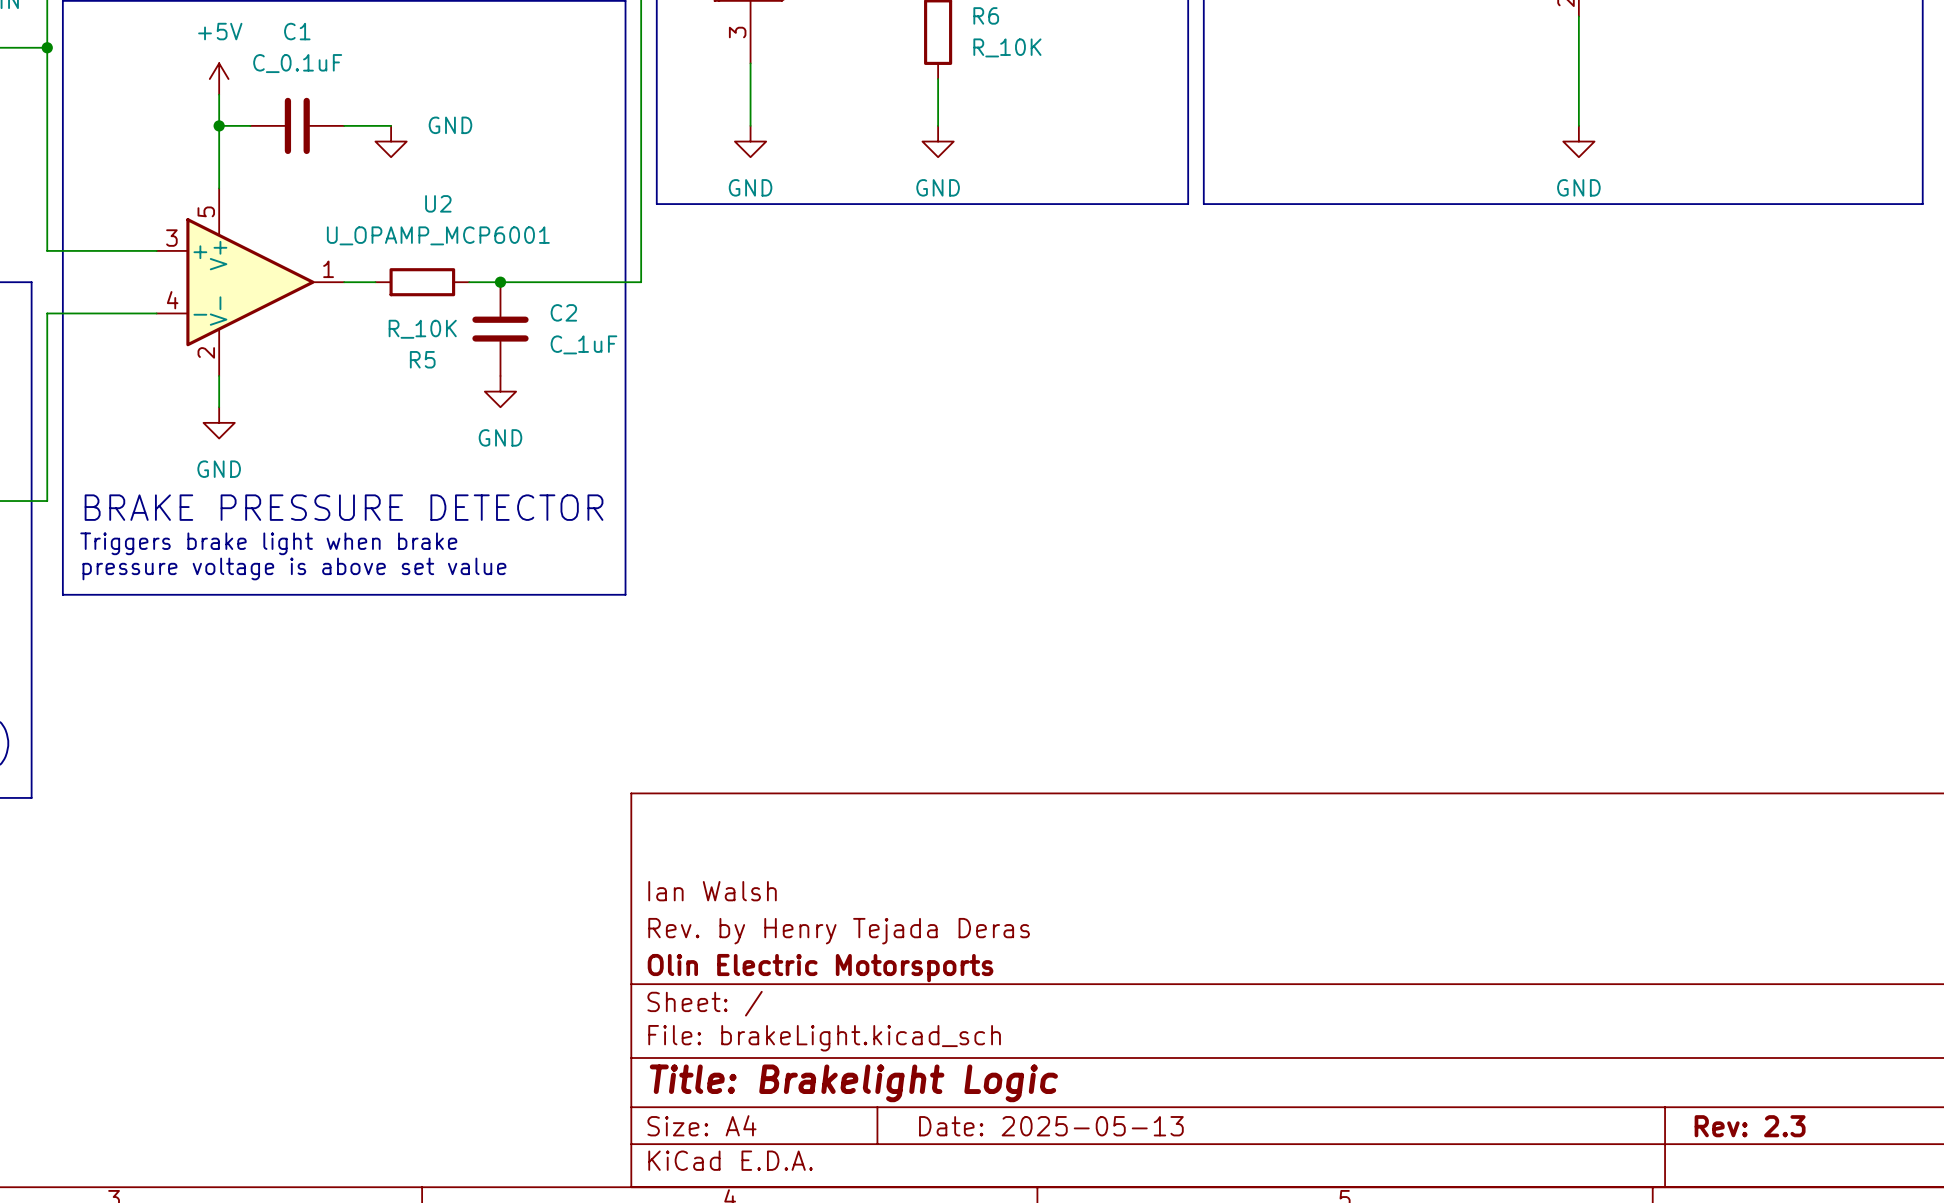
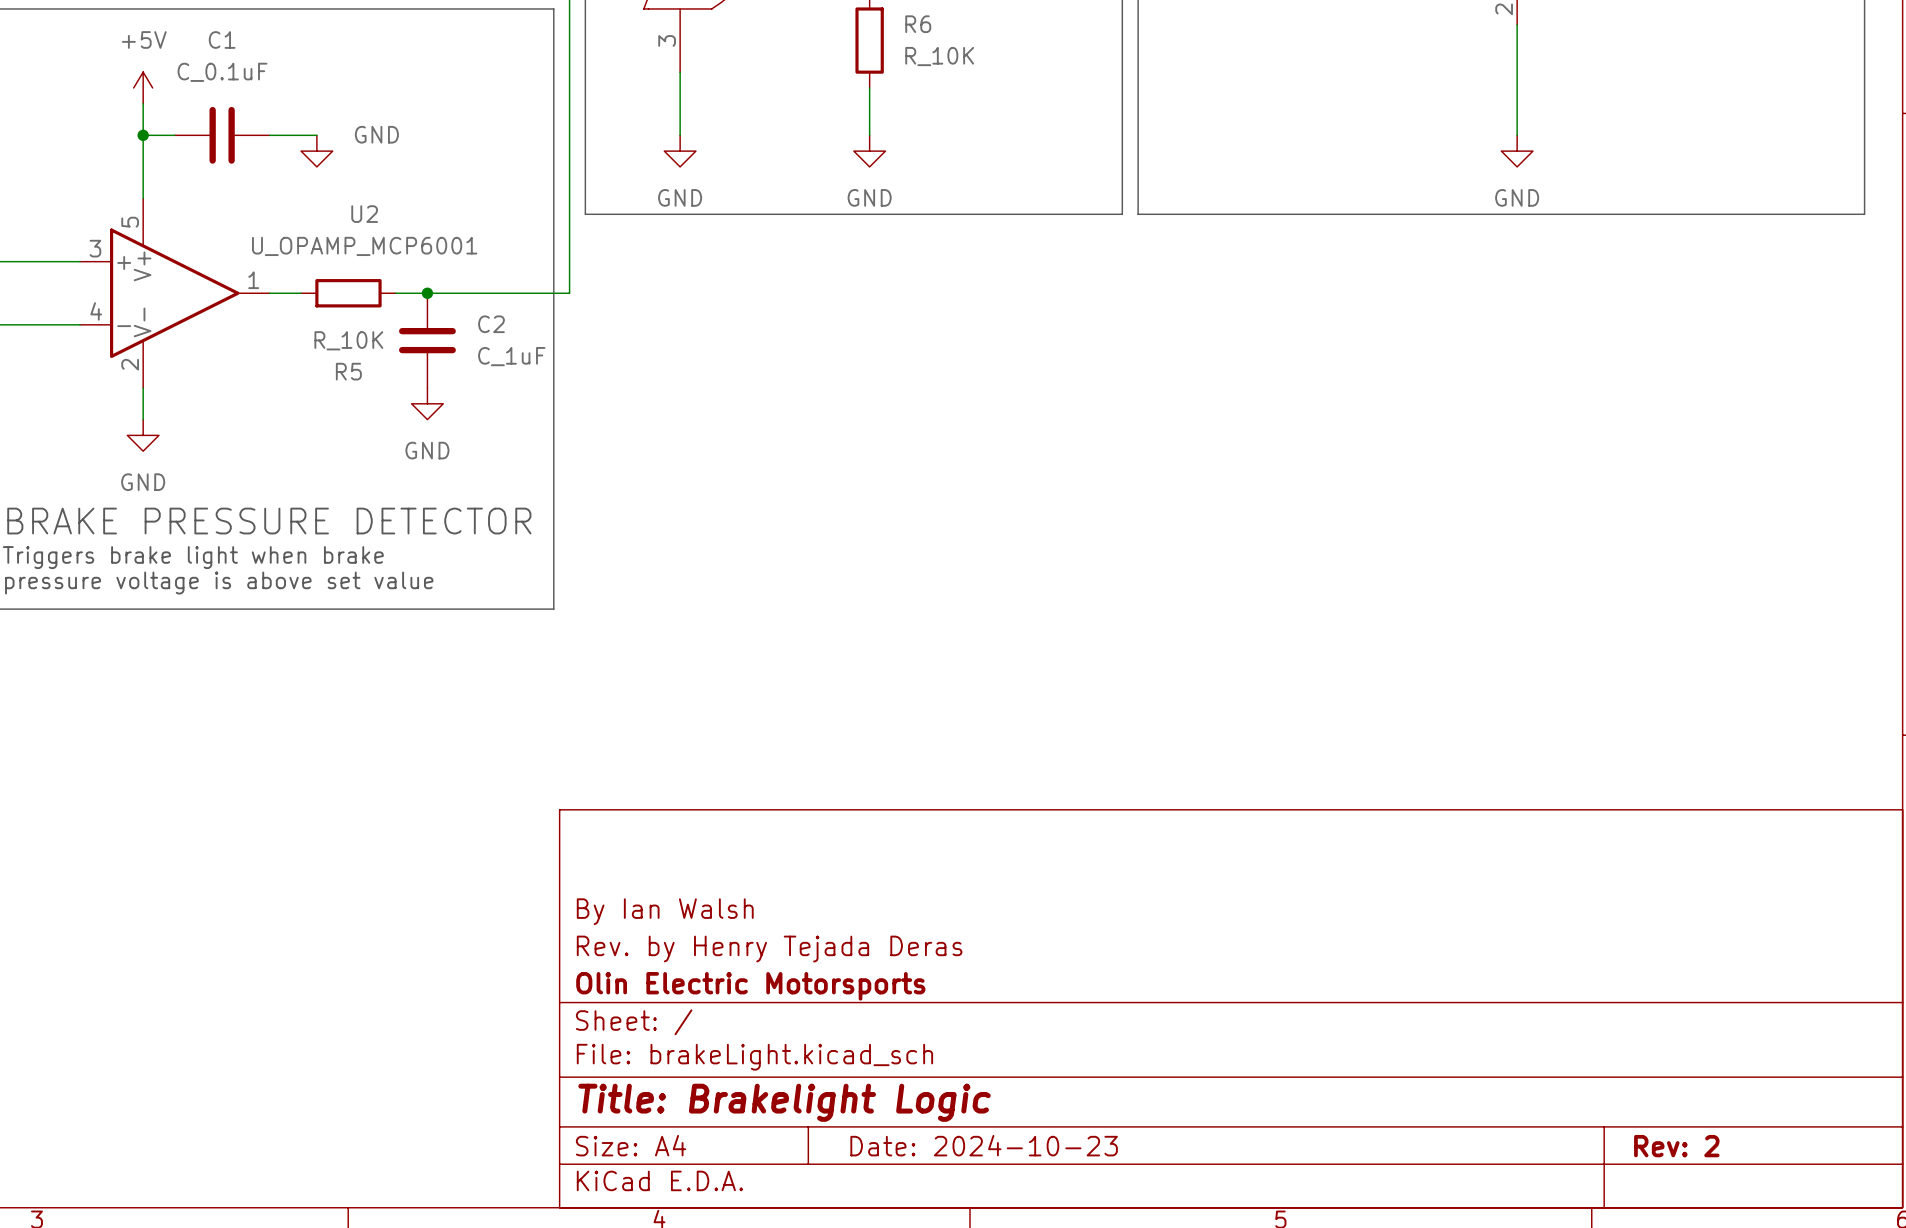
title block: Ian Walsh (712, 891) -> By Ian Walsh (665, 911)
title block: Date: 2025-05-13 (1051, 1126) -> Date: 2024-10-23 (984, 1145)
title block: Rev: 2.3 (1750, 1126) -> Rev: 2 (1676, 1146)

